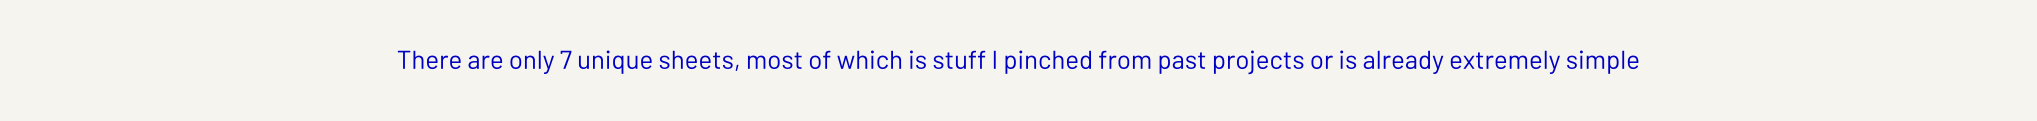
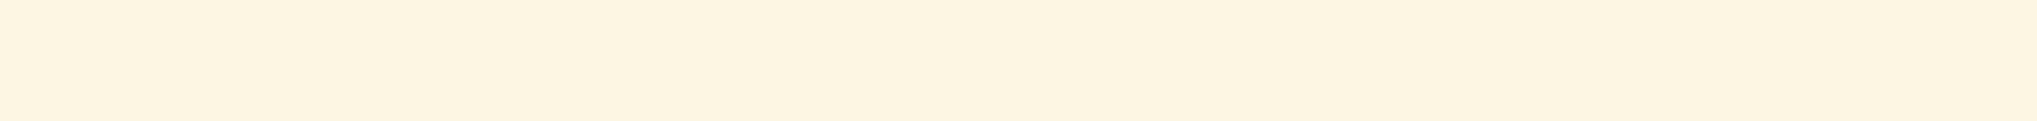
text: There are only 7 unique sheets, most of which is stuff I pinched from past projects or is already extremely simple (1018, 62) -> none

